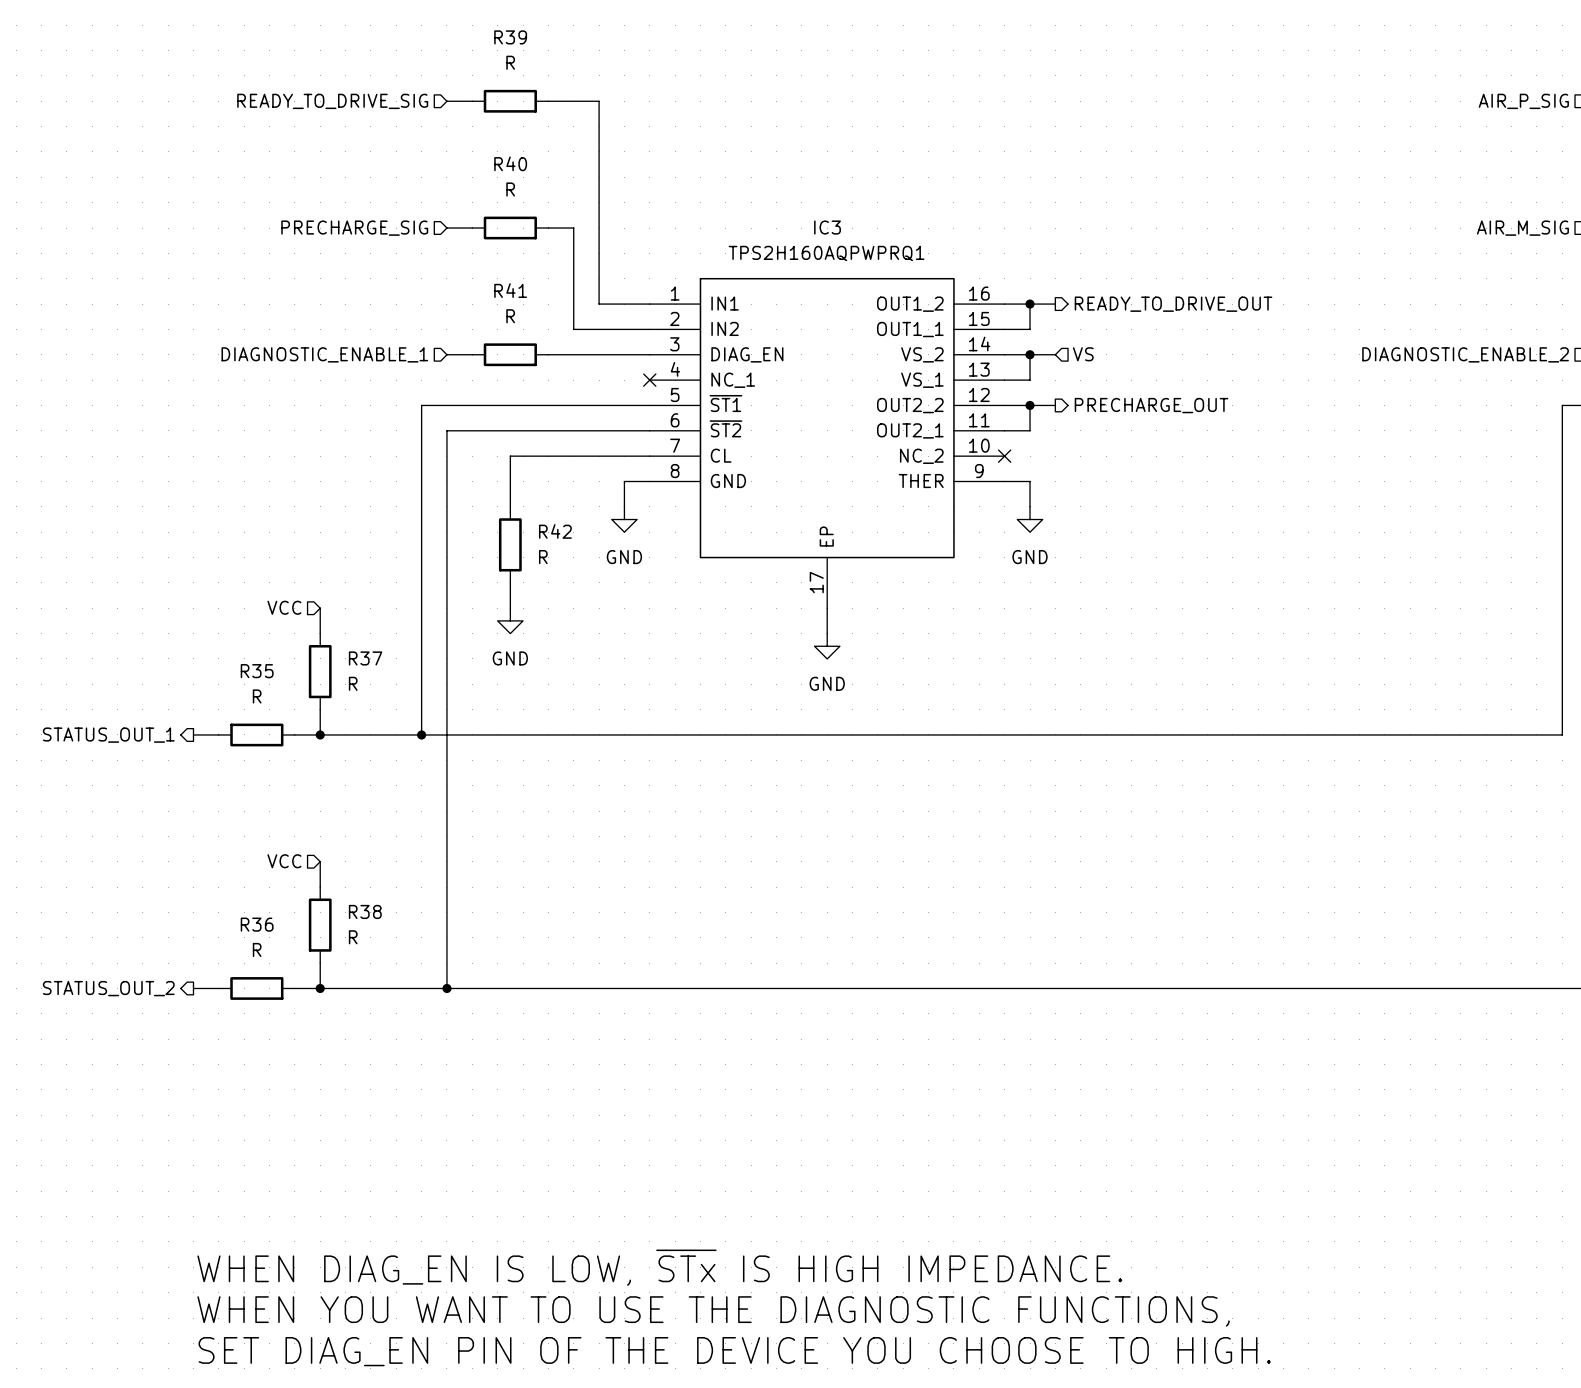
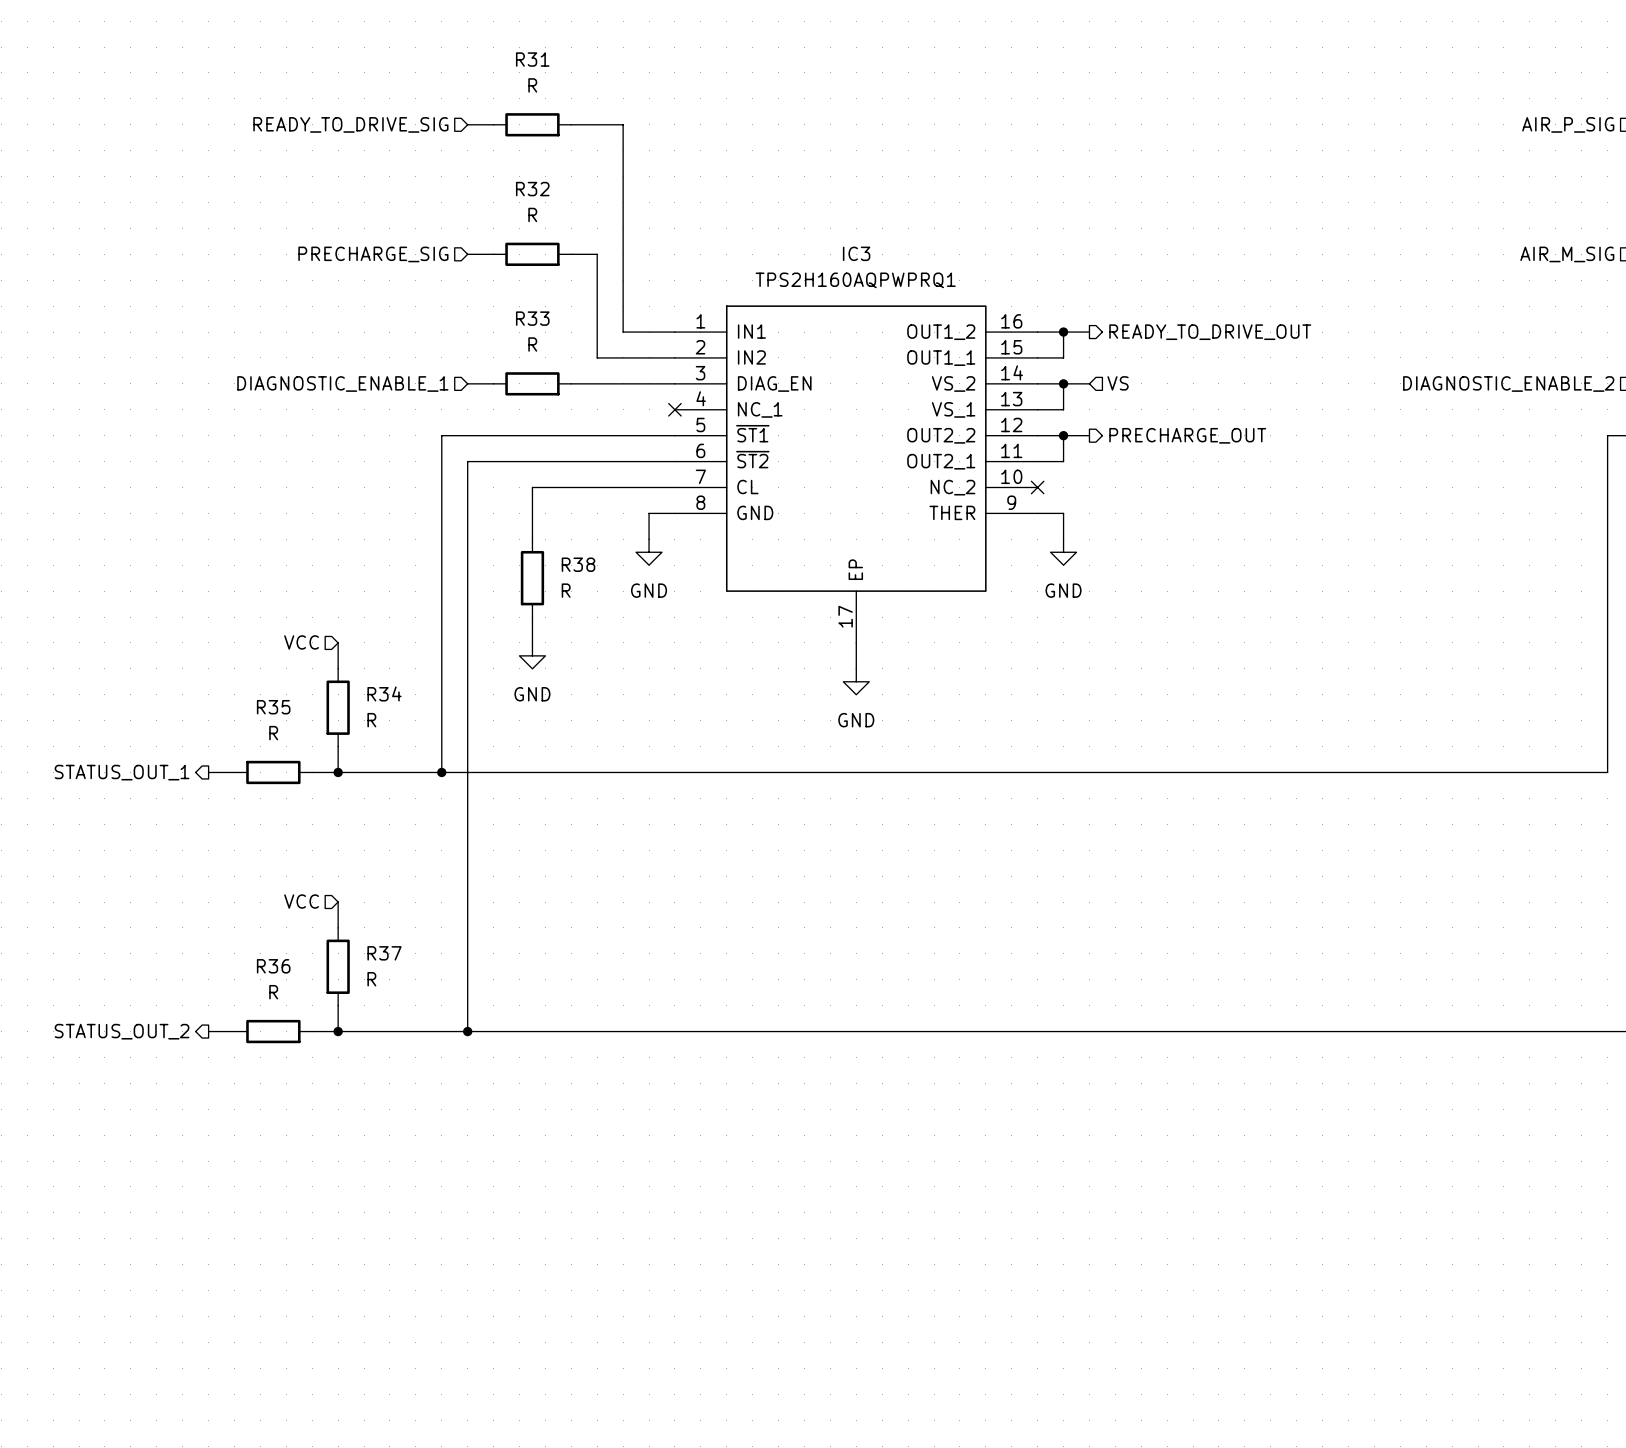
R39 name: R39 (510, 37) -> R31 (532, 59)
R40 name: R40 (510, 163) -> R32 (532, 189)
R41 name: R41 (510, 290) -> R33 (532, 318)
R42 name: R42 (555, 531) -> R38 (578, 564)
R37 name: R37 (365, 658) -> R34 (384, 693)
R38 name: R38 (365, 911) -> R37 (384, 953)
text: WHEN DIAG_EN IS LOW, ~{STx} IS HIGH IMPEDANCE. (659, 1267) -> none
text: WHEN YOU WANT TO USE THE DIAGNOSTIC FUNCTIONS, (713, 1311) -> none
text: SET DIAG_EN PIN OF THE DEVICE YOU CHOOSE TO HIGH. (734, 1351) -> none

